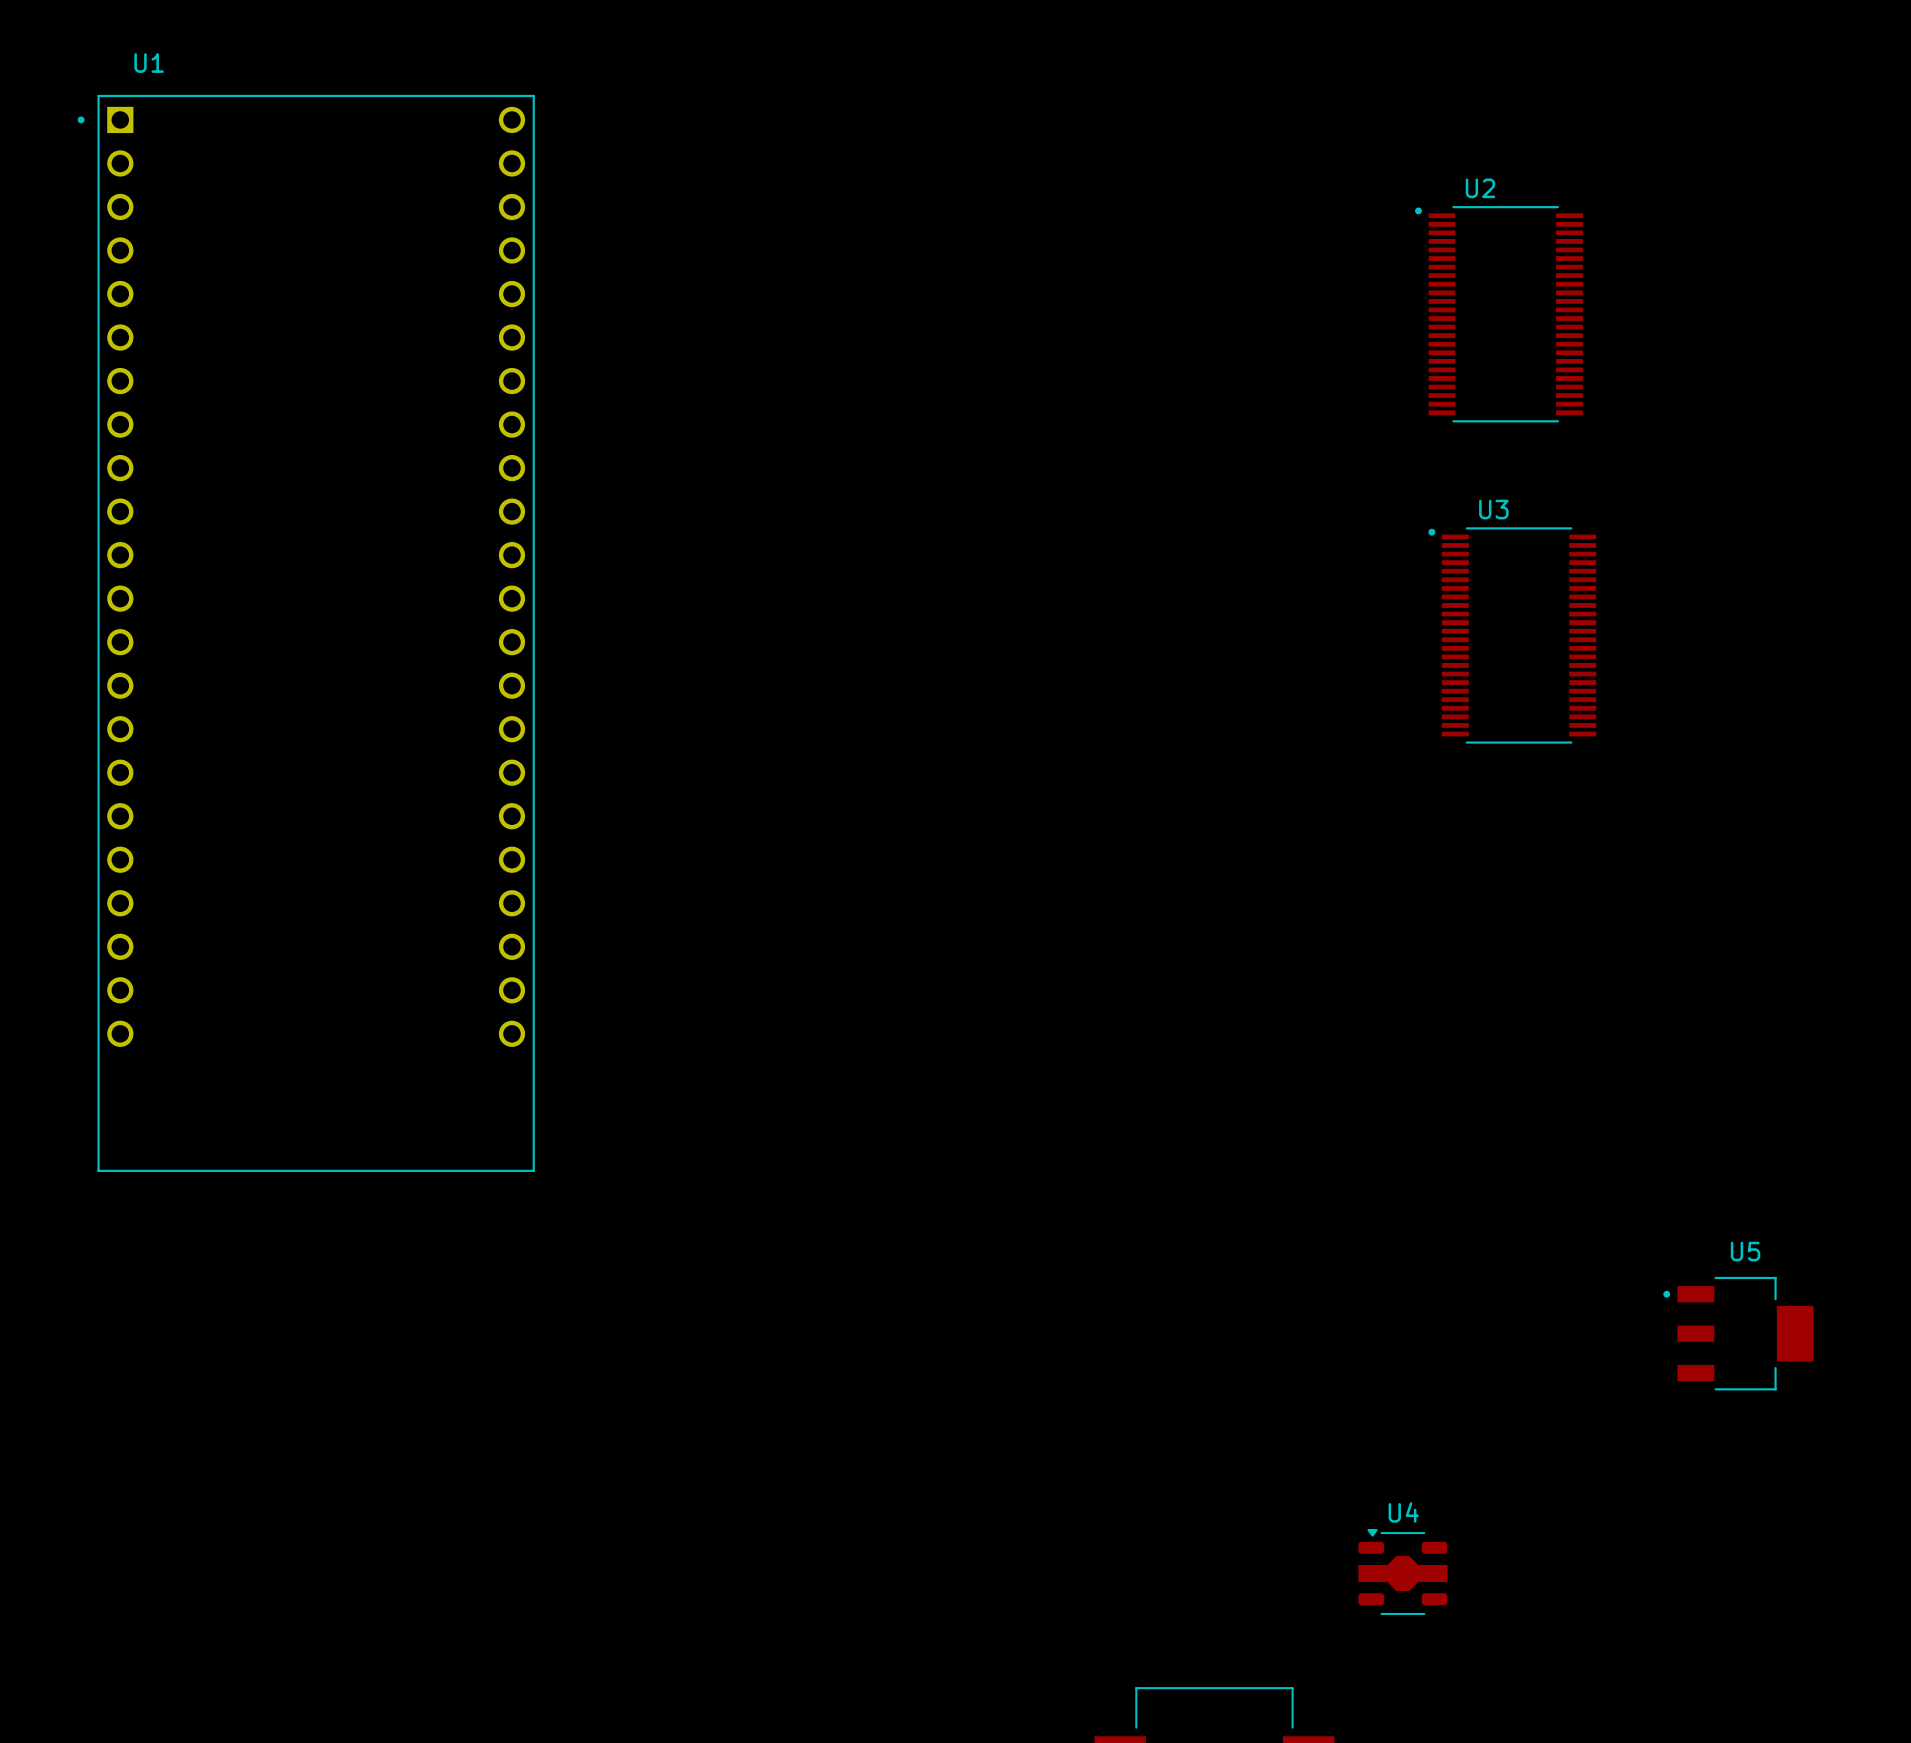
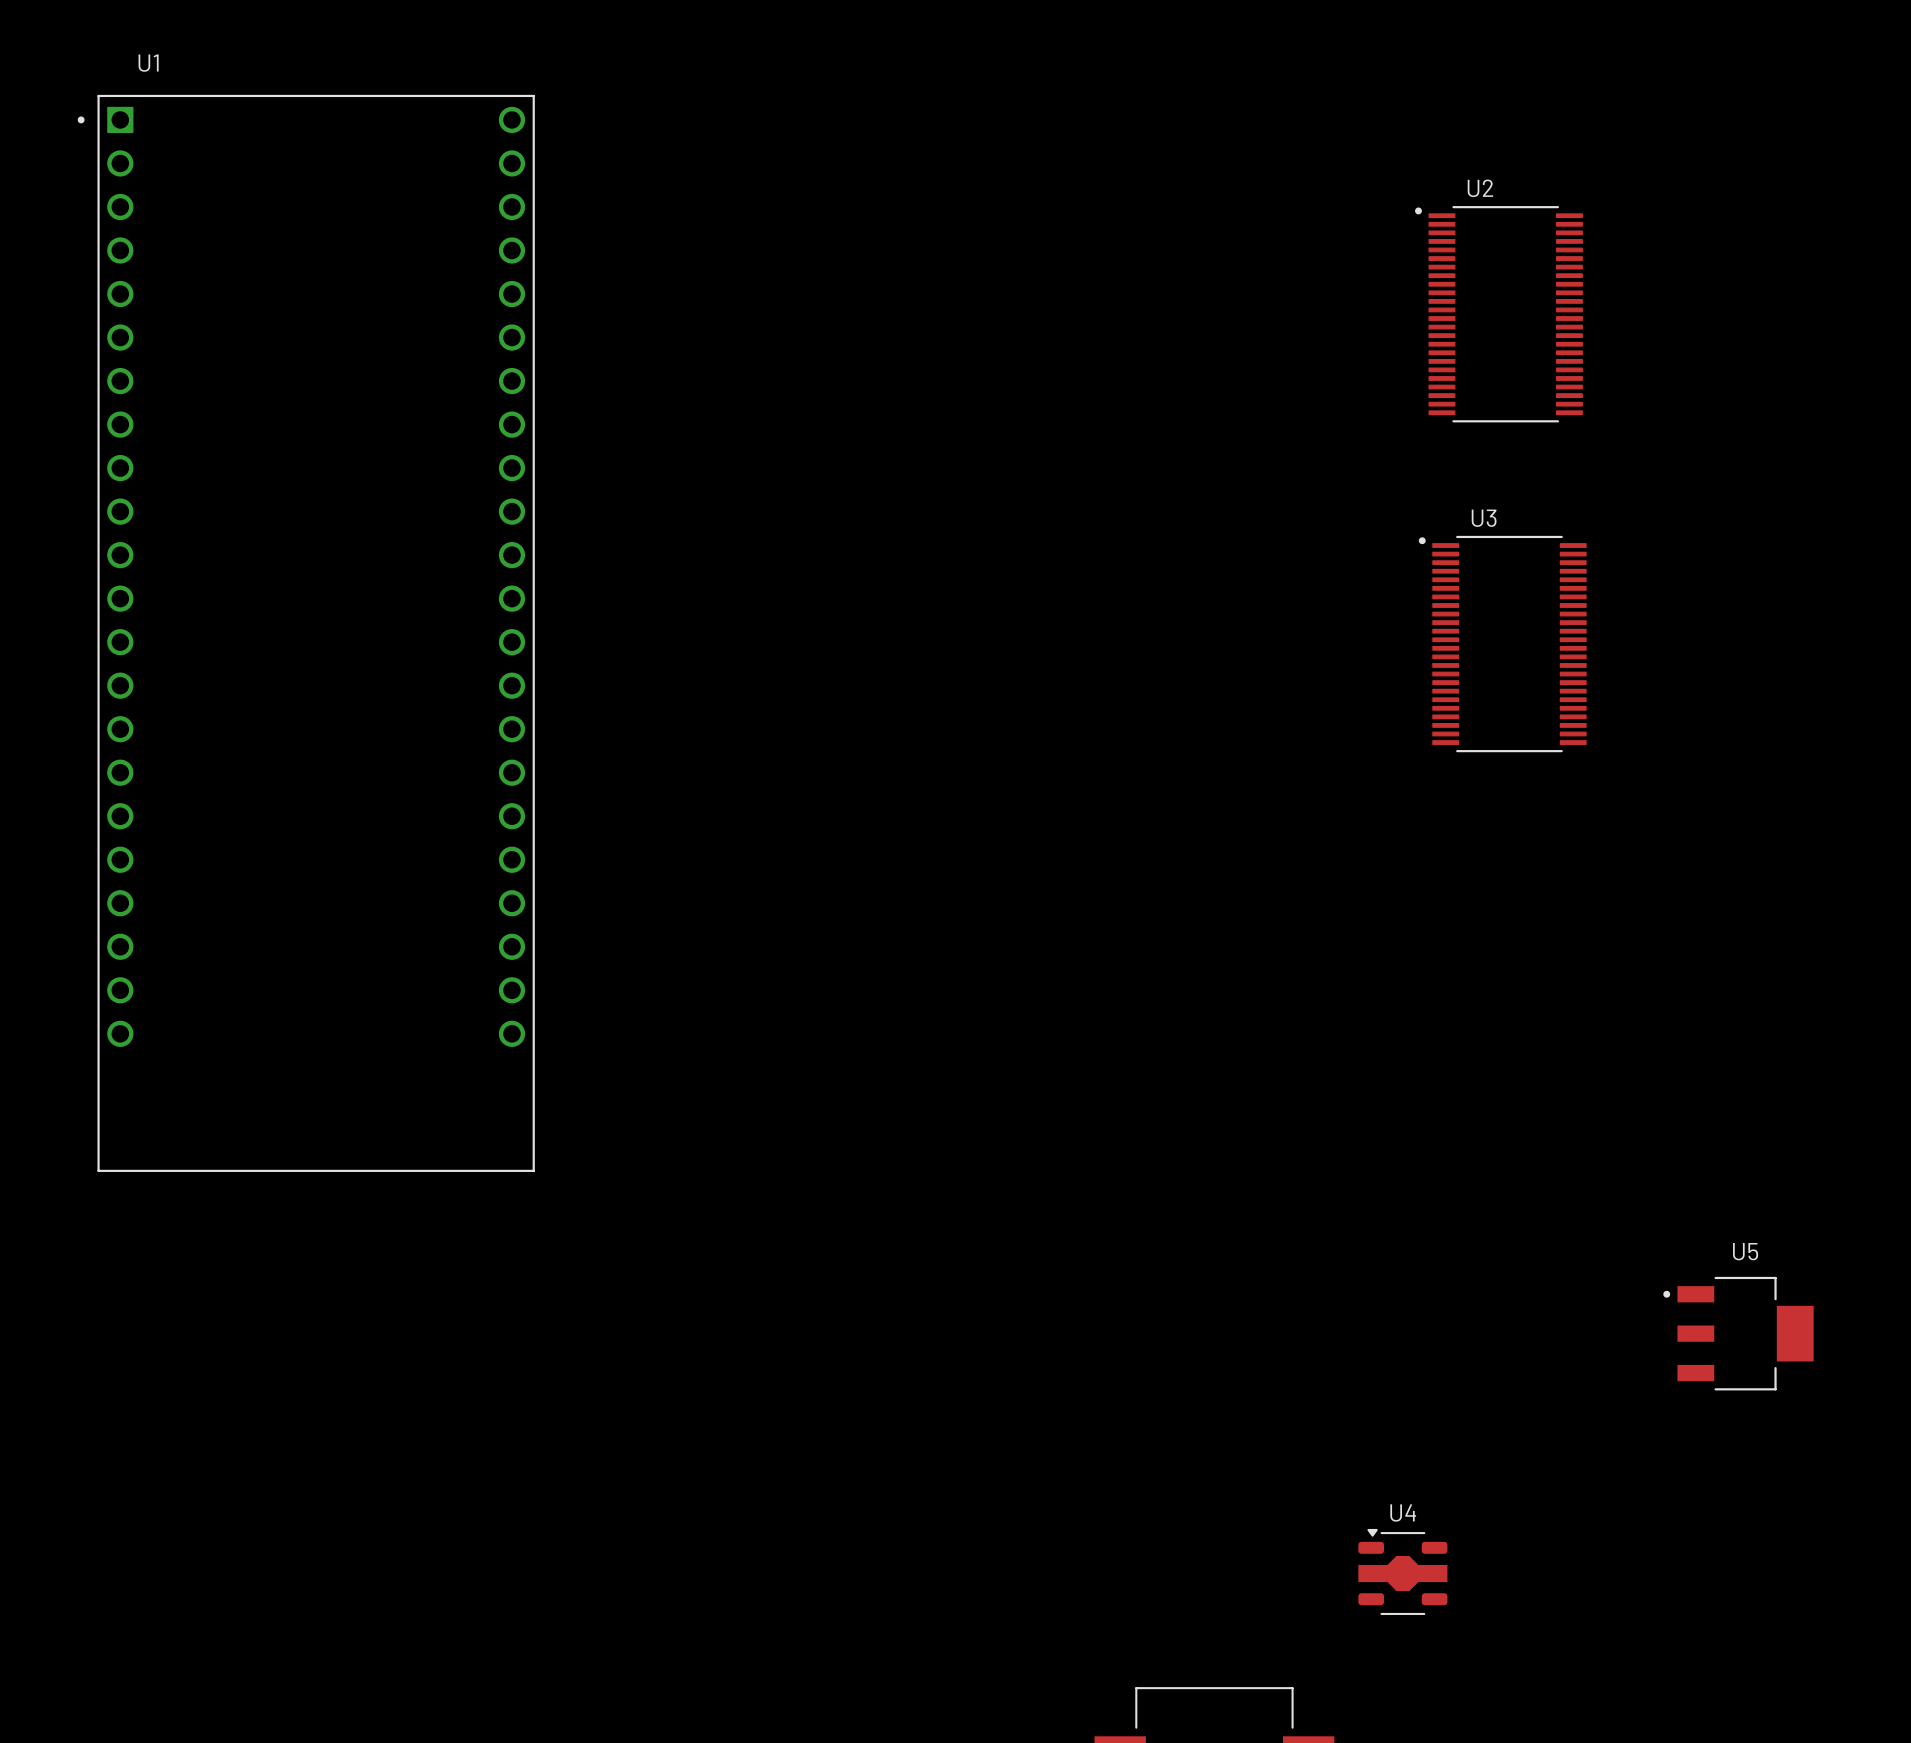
U3 position: (1512, 635) -> (1502, 644)

